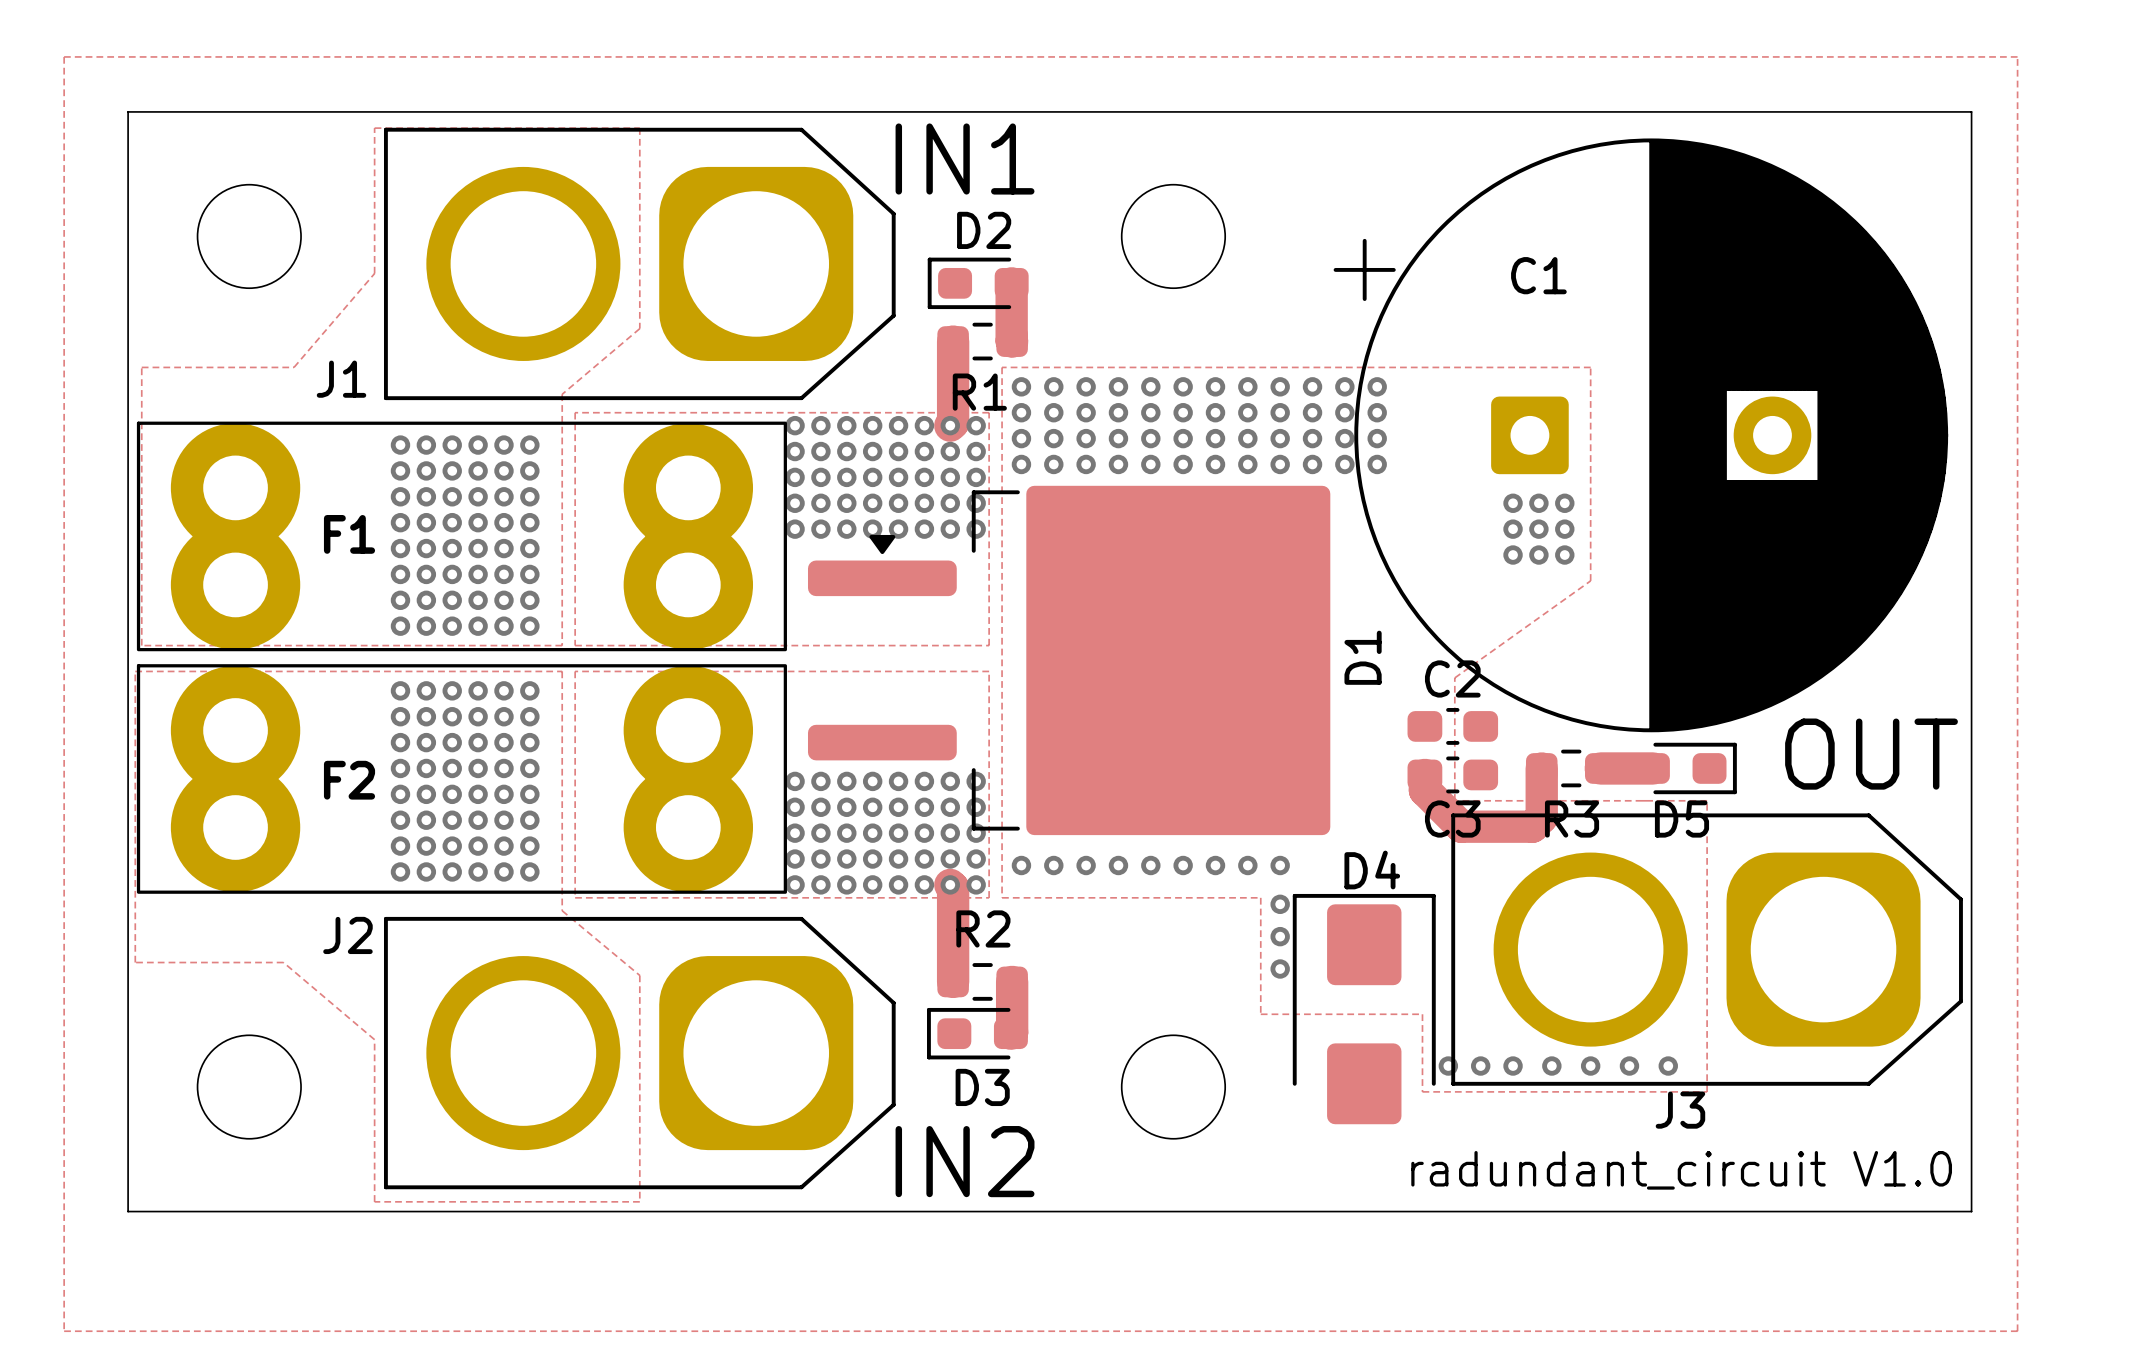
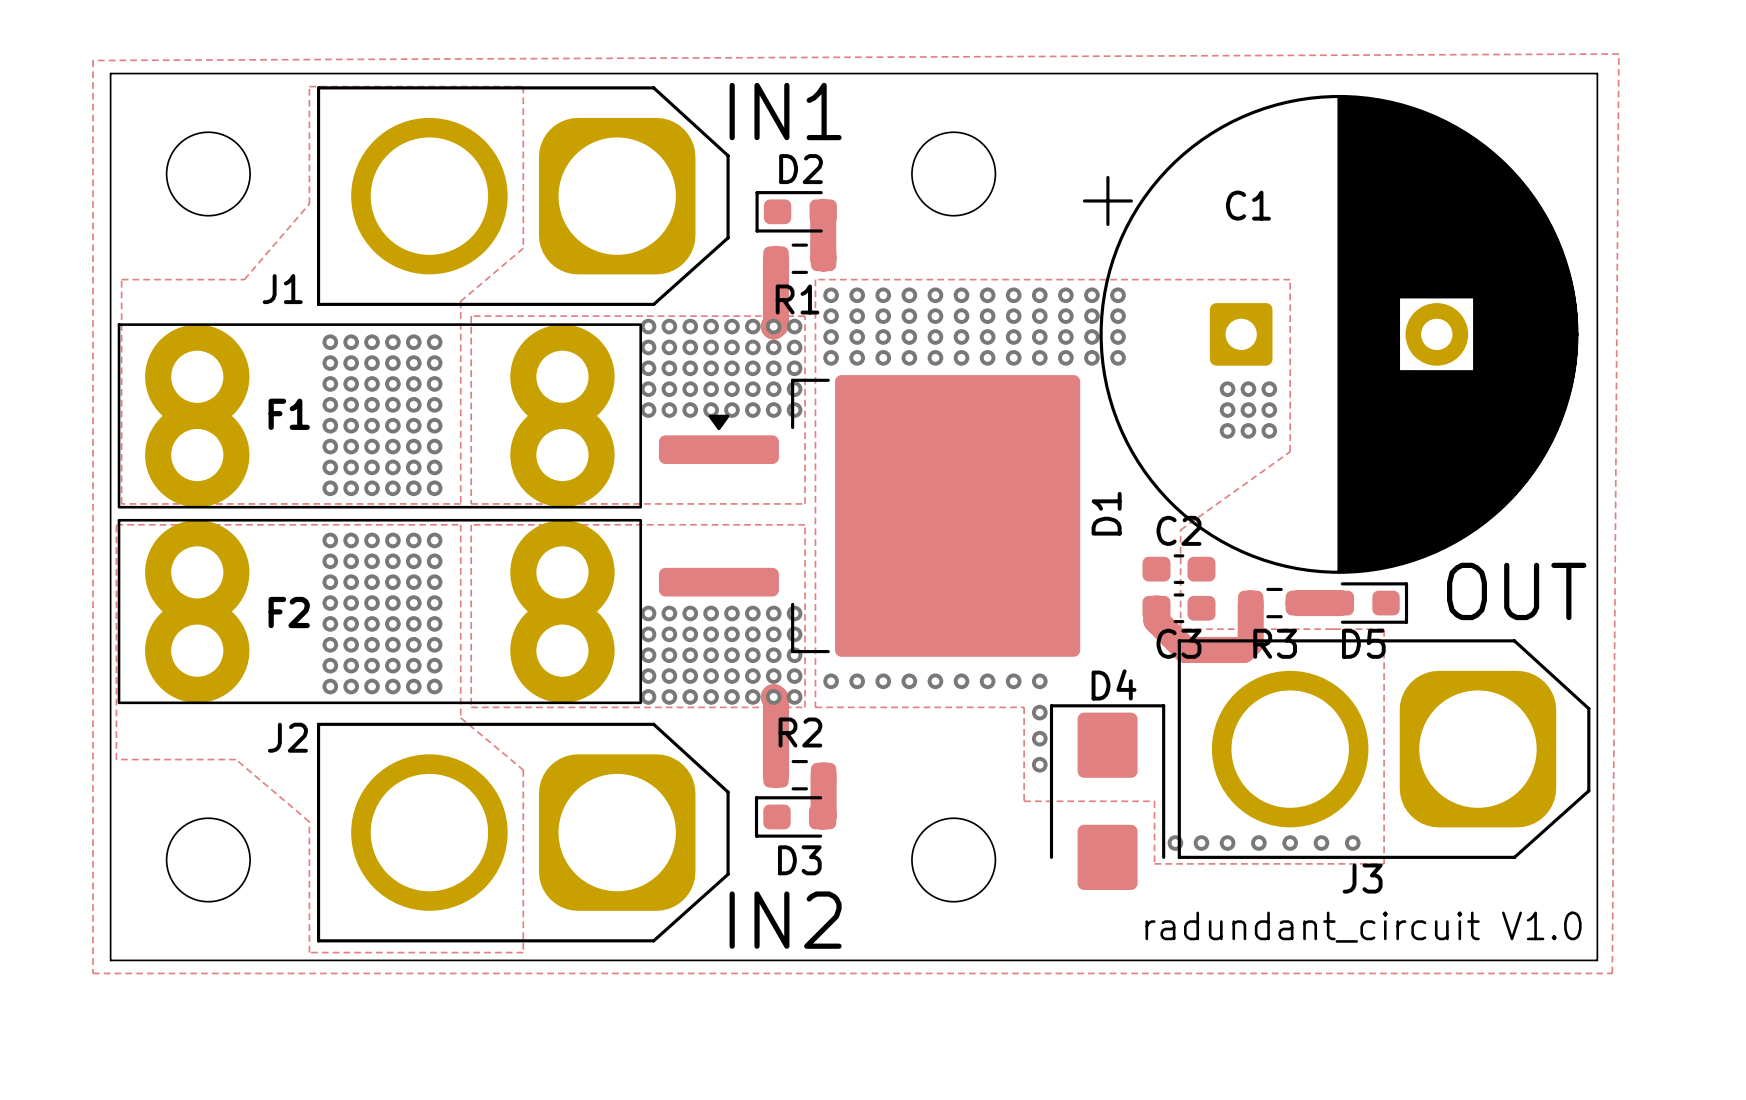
zone outline: (64, 56) (64, 1331) (2017, 1331) (2017, 56) (64, 56) -> (1618, 53) (92, 60) (92, 973) (1612, 973) (1618, 53)

